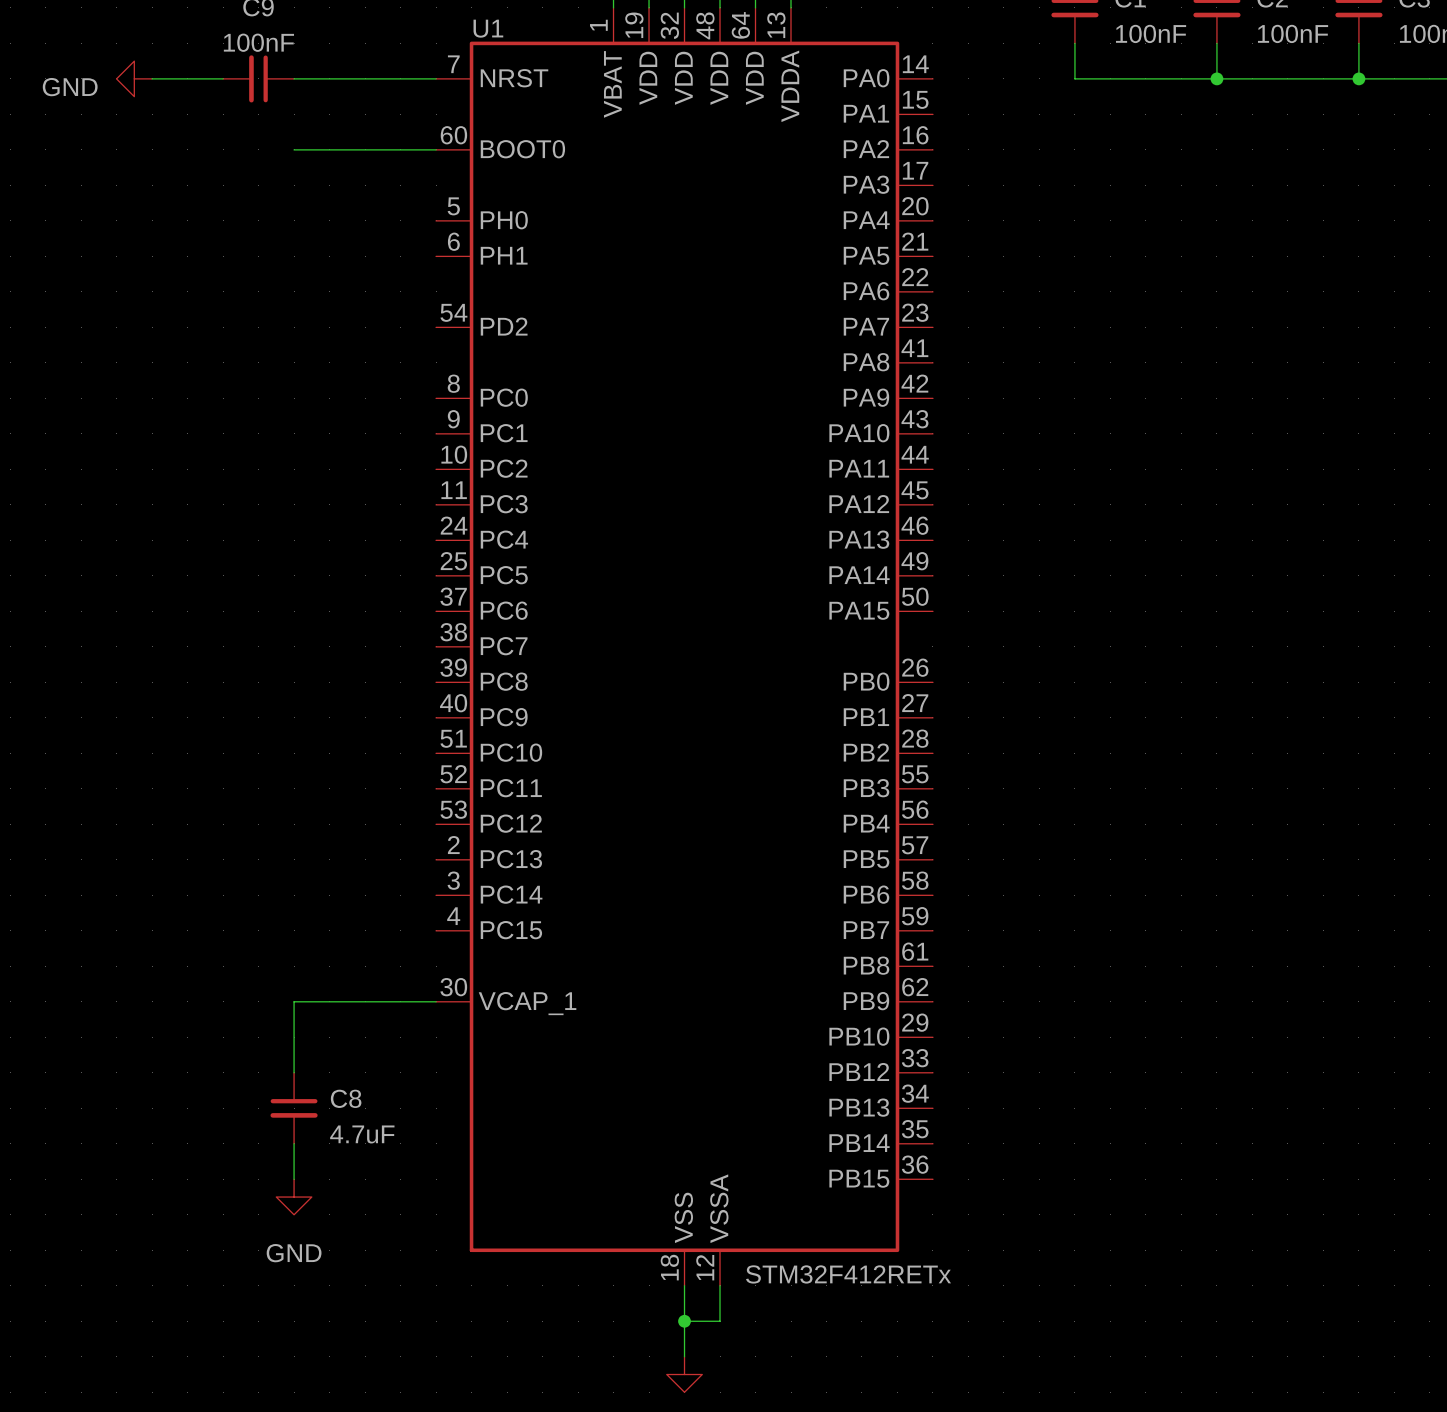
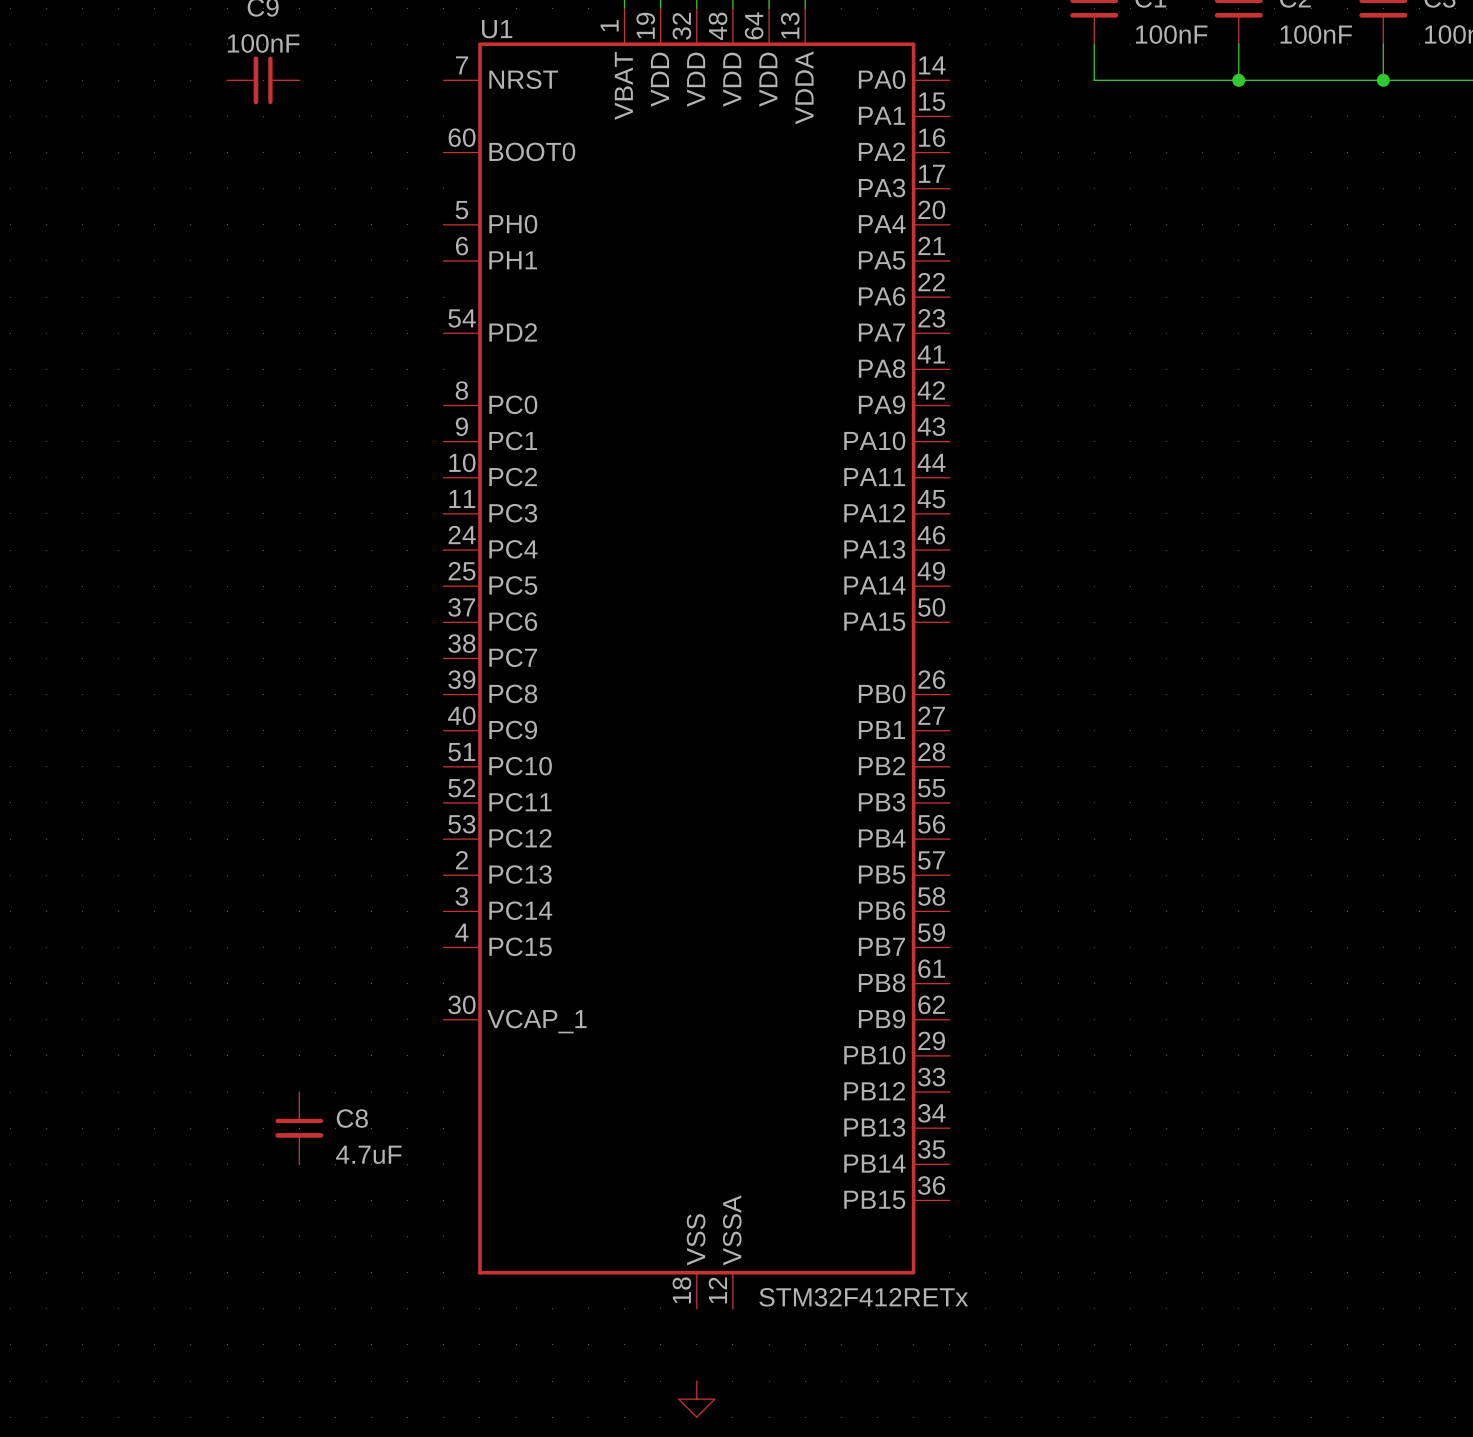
power symbol: GND (134, 78) -> none
wire: (152, 78) (223, 78) -> none
wire: (294, 78) (436, 78) -> none
wire: (294, 149) (436, 149) -> none
wire: (436, 1001) (294, 1001) (294, 1072) -> none
wire: (294, 1143) (294, 1179) -> none
power symbol: GND (294, 1197) -> none
wire: (684, 1285) (684, 1356) -> none
wire: (720, 1285) (720, 1321) (684, 1321) -> none
junction: (684, 1321) -> none

